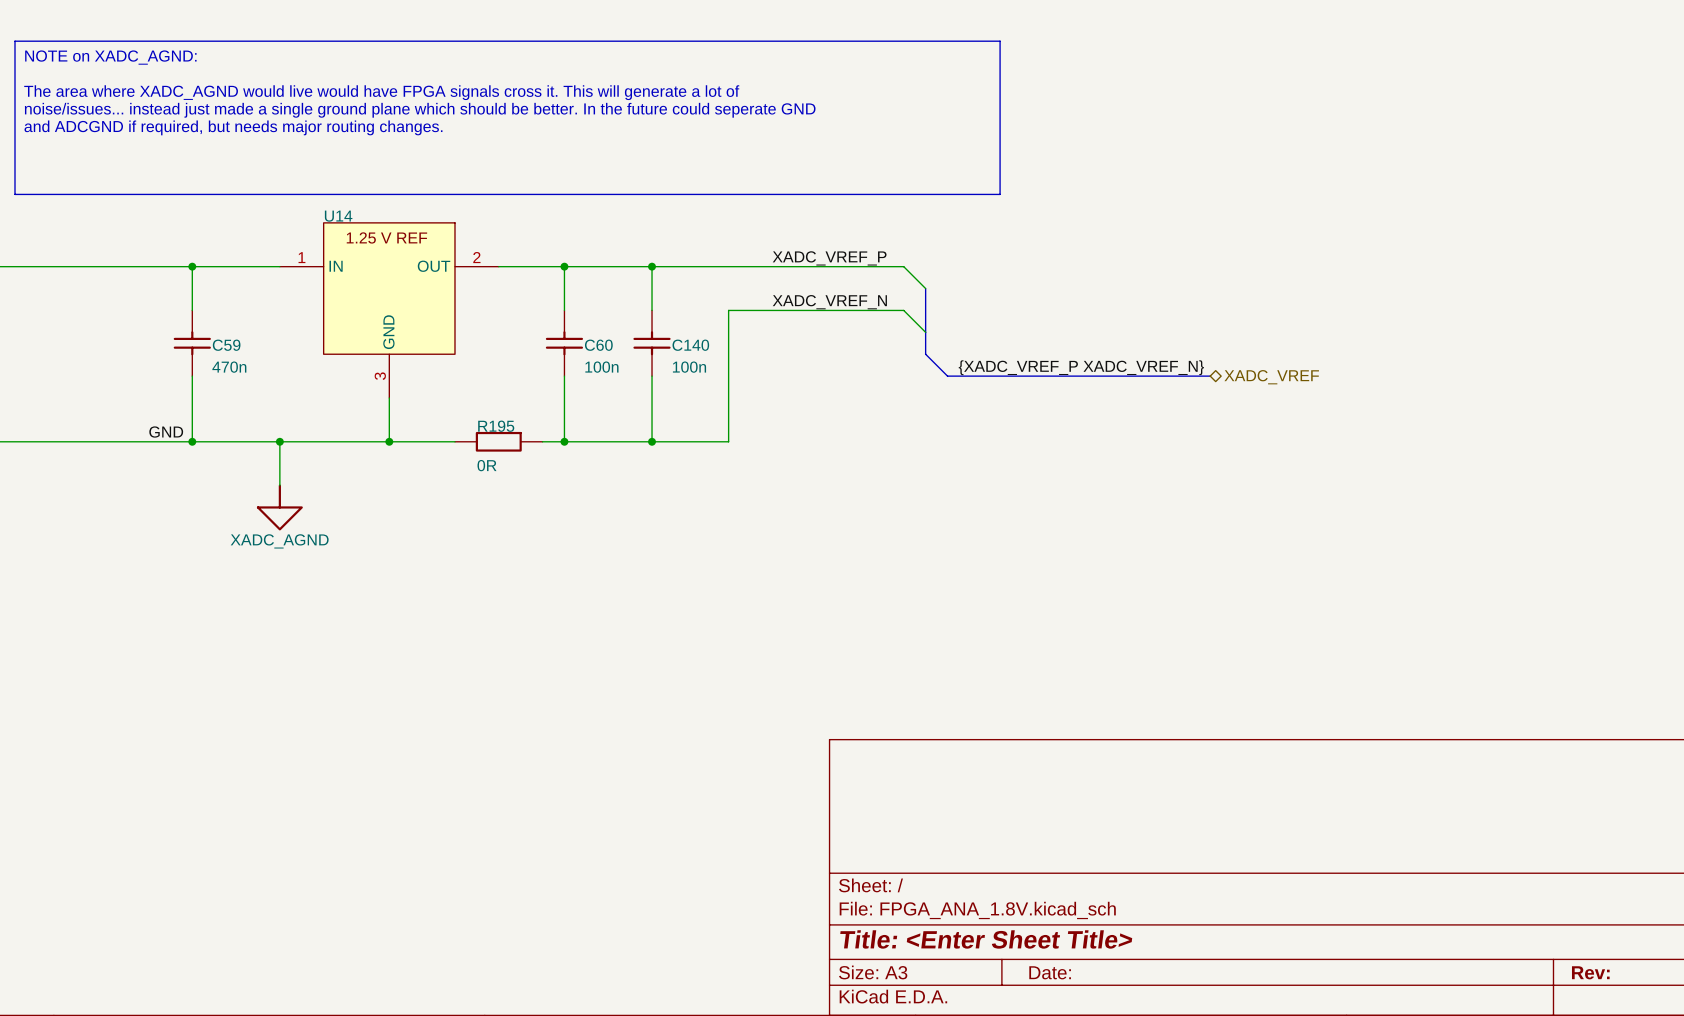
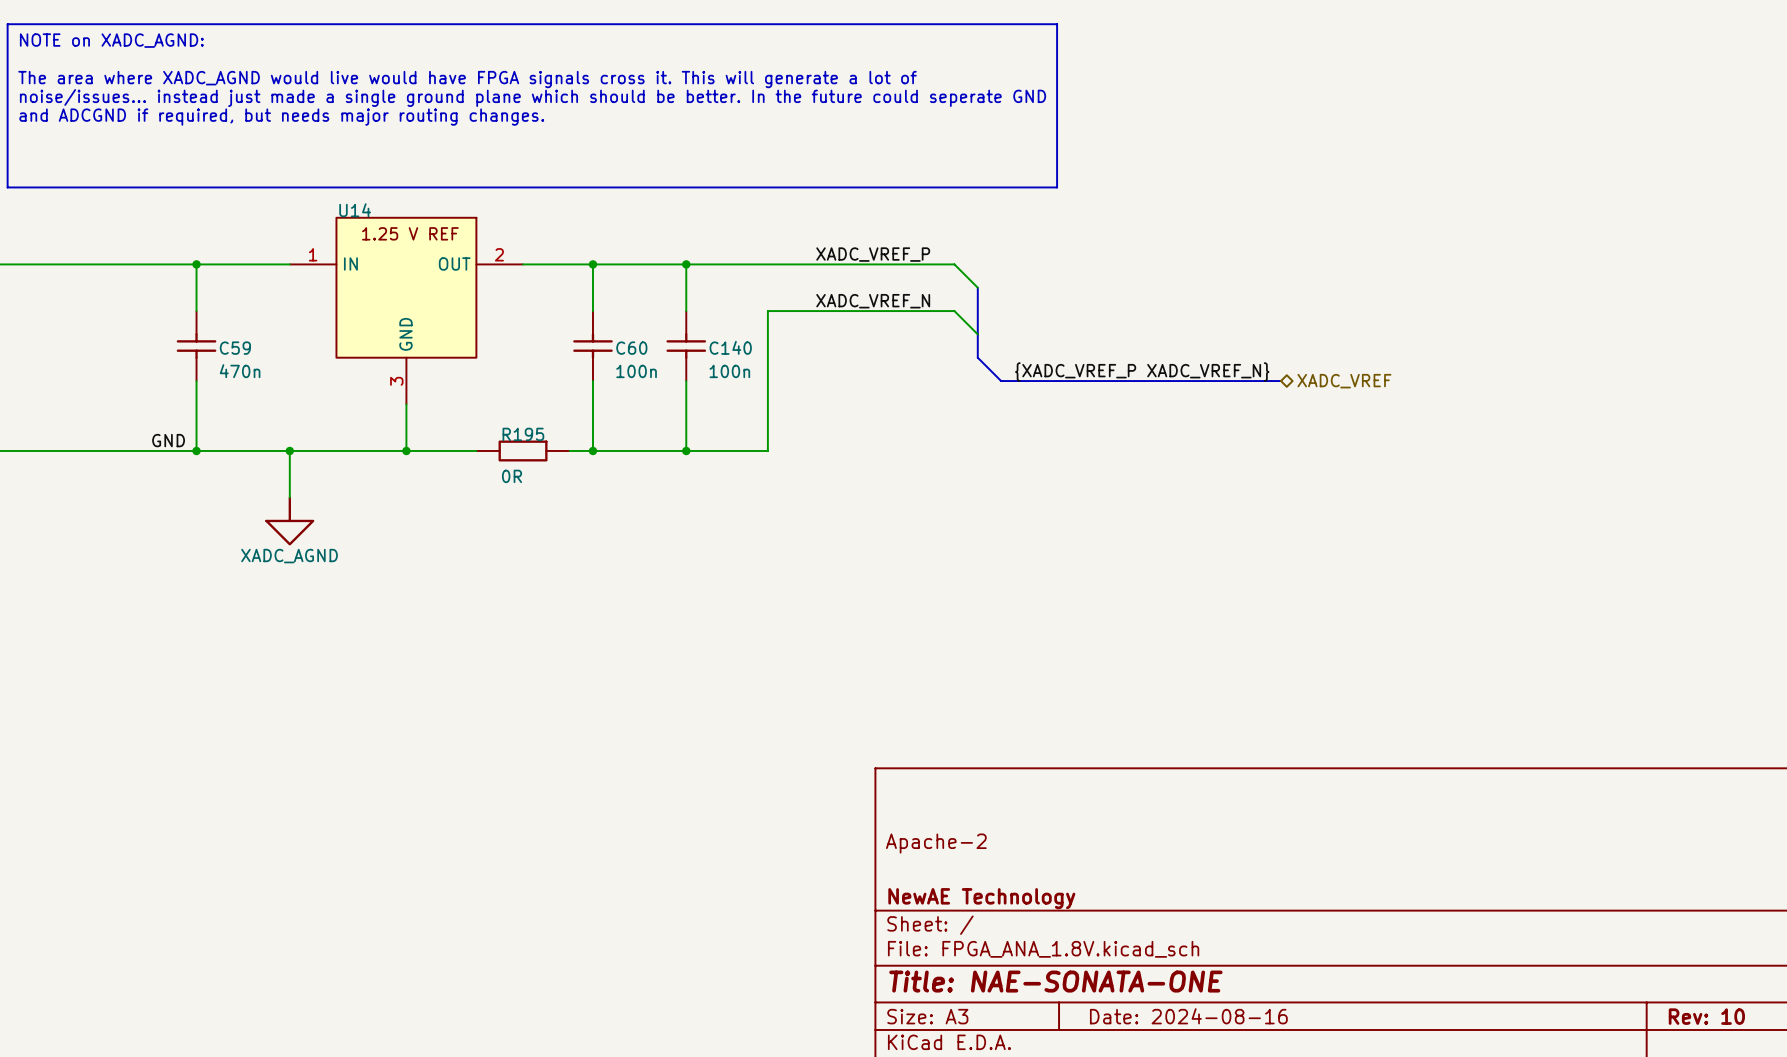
title block: none -> Apache-2 (936, 843)
title block: none -> NewAE Technology (981, 898)
title block: Title: <Enter Sheet Title> (986, 939) -> Title: NAE-SONATA-ONE (1055, 981)
title block: Date: (1050, 972) -> Date: 2024-08-16 (1188, 1016)
title block: Rev: (1590, 972) -> Rev: 10 (1706, 1016)

